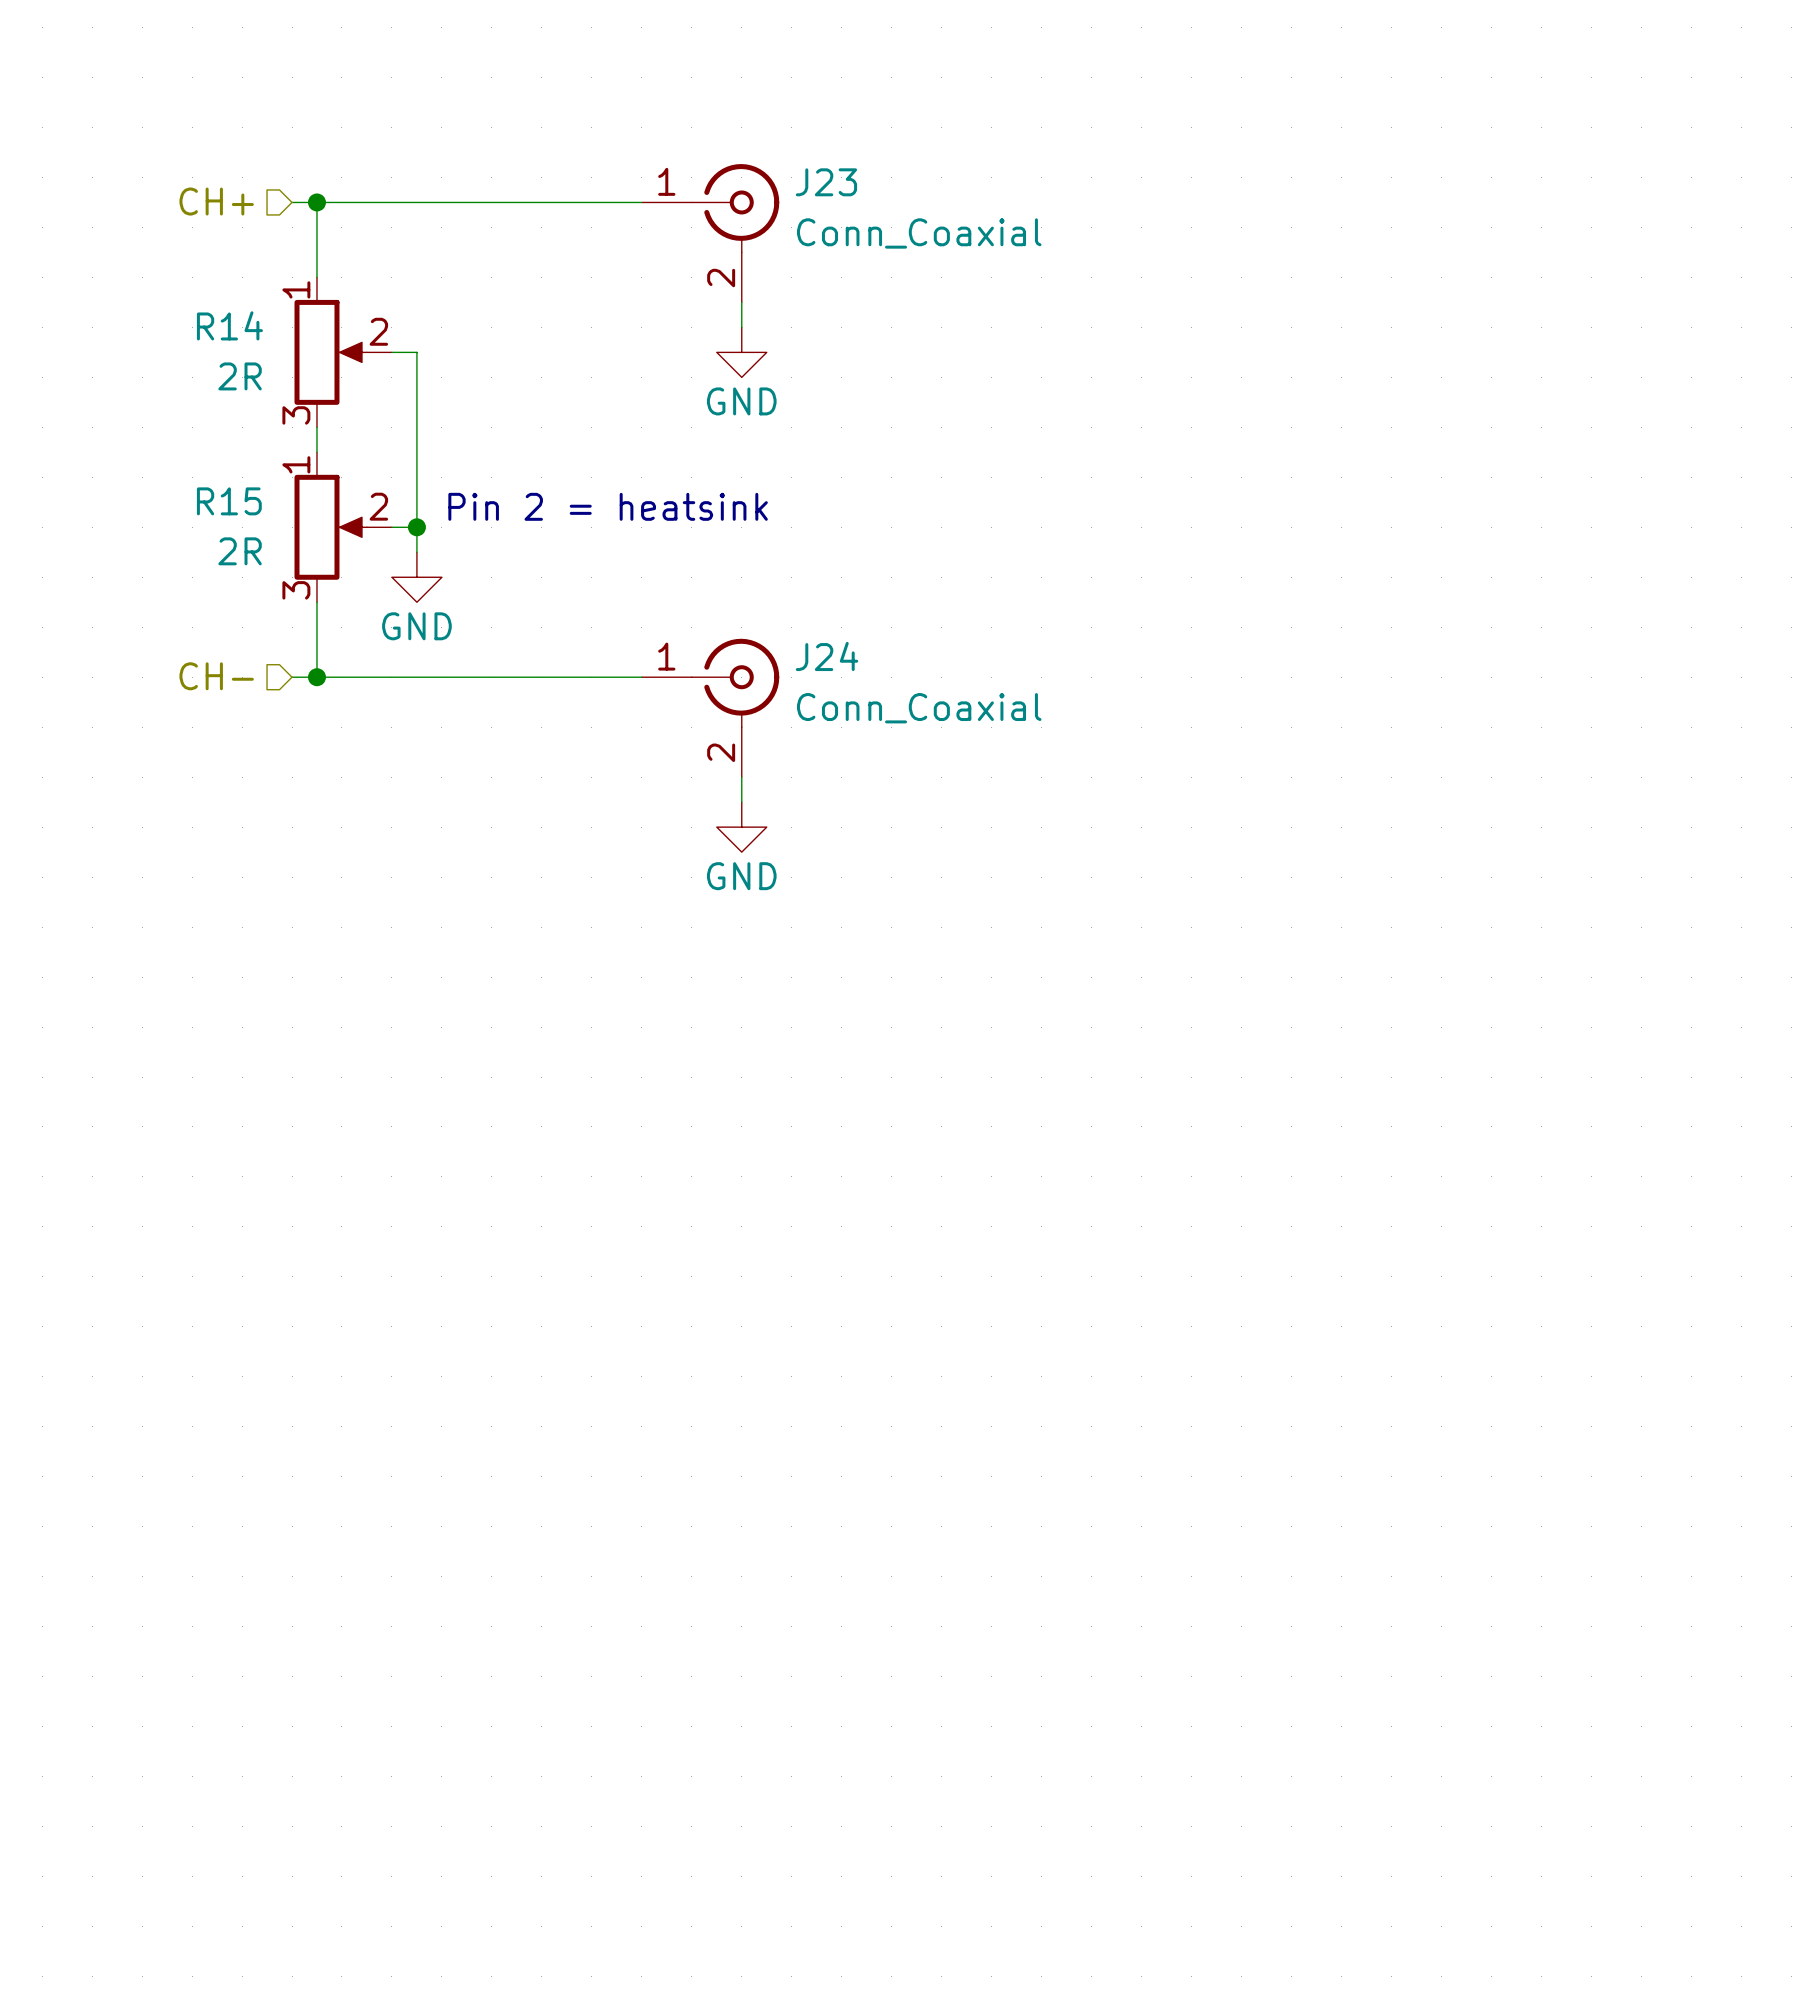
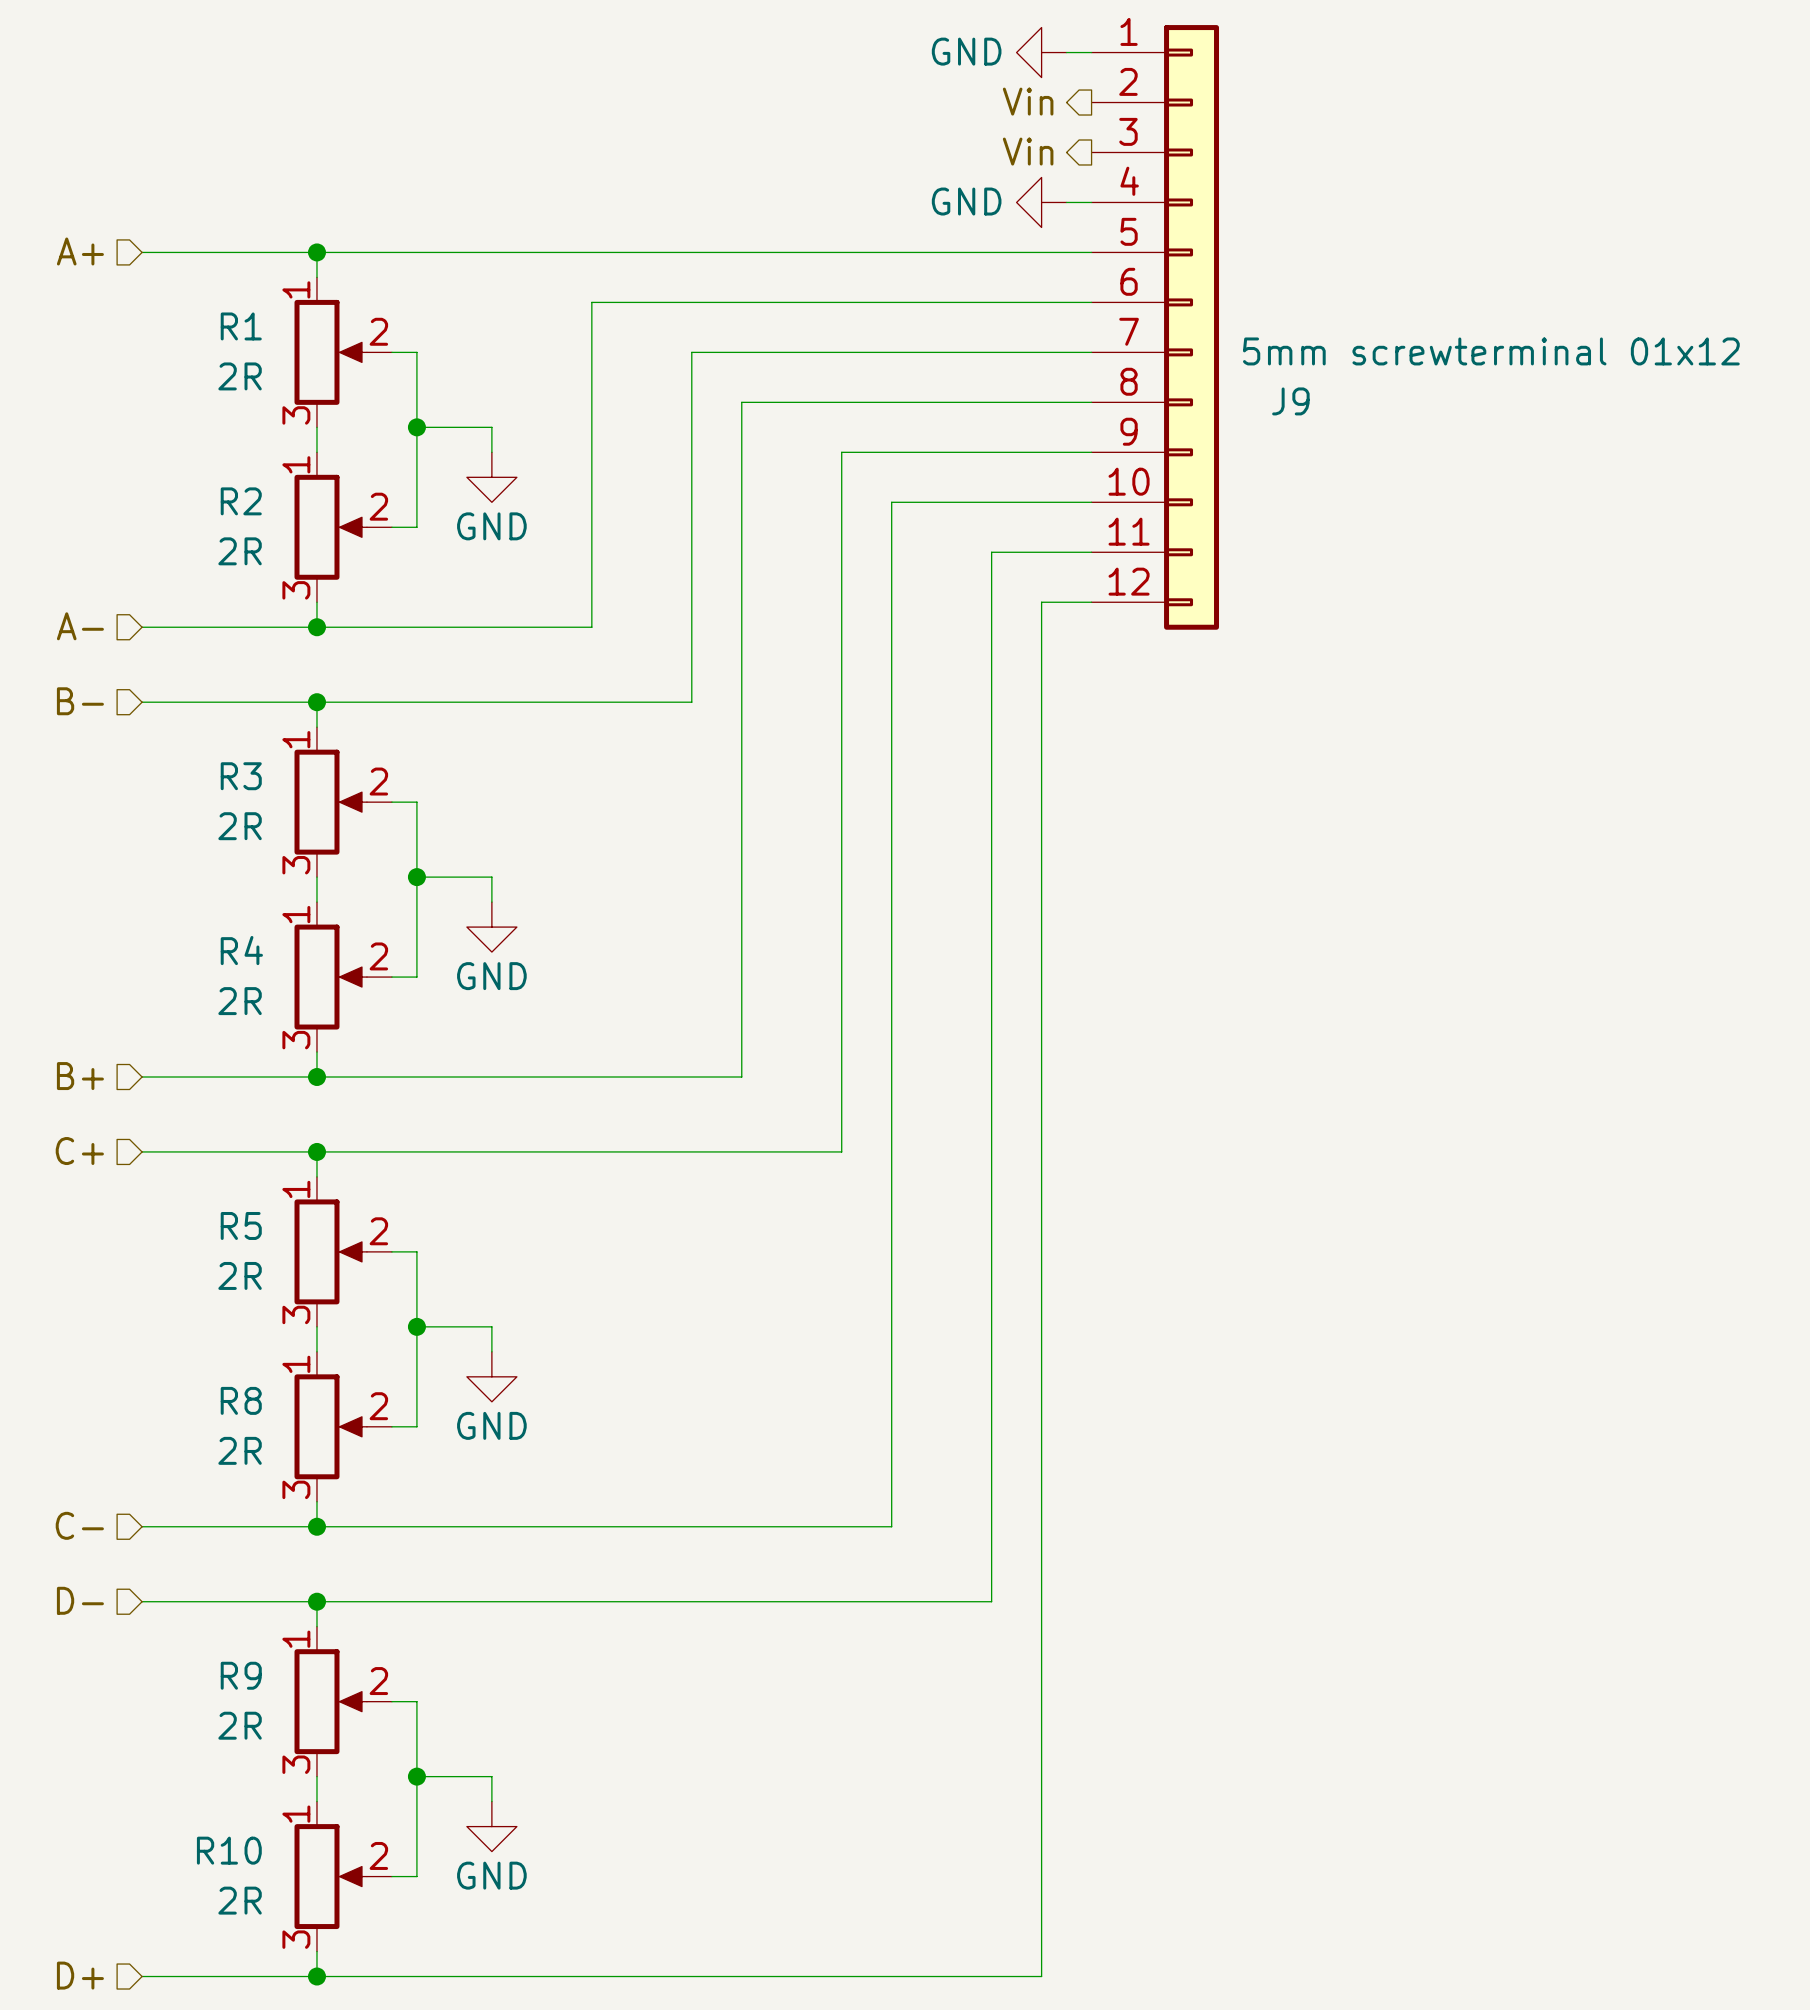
power symbol: none -> GND (1041, 52)
wire: none -> (1066, 52) (1091, 52)
hierarchical label: none -> Vin (1028, 101)
hierarchical label: none -> Vin (1028, 151)
hierarchical label: CH+ (216, 201) -> none
wire: (292, 202) (641, 202) -> none
wire: (316, 202) (316, 252) -> none
junction position: (316, 202) -> (316, 252)
power symbol: none -> GND (1041, 202)
wire: none -> (1066, 202) (1091, 202)
J23: Conn_Coaxial (710, 233) -> none
hierarchical label: none -> A+ (80, 251)
wire: none -> (142, 252) (1091, 252)
wire: (741, 302) (741, 327) -> none
wire: none -> (1091, 302) (591, 302) (591, 627) (142, 627)
R14 name: R14 (229, 325) -> R1 (241, 326)
J9: none -> 5mm screwterminal 01x12 (1155, 327)
power symbol: GND (741, 352) -> none
wire: none -> (1091, 352) (691, 352) (691, 702) (142, 702)
wire: none -> (1091, 402) (741, 402) (741, 777)
wire: none -> (416, 427) (491, 427) (491, 452)
junction: none -> (416, 427)
wire: none -> (1091, 452) (841, 452) (841, 1151) (142, 1151)
R15 name: R15 (229, 501) -> R2 (241, 501)
wire: none -> (1091, 502) (891, 502) (891, 1526) (142, 1526)
text: Pin 2 = heatsink (608, 506) -> none
wire: (416, 527) (416, 552) -> (316, 702) (316, 727)
junction: (416, 527) -> none
wire: none -> (1091, 552) (991, 552) (991, 1601) (142, 1601)
power symbol position: GND (416, 577) -> GND (491, 477)
wire: none -> (1091, 602) (1041, 602) (1041, 1976) (142, 1976)
hierarchical label: none -> A- (80, 626)
wire: (316, 627) (316, 677) -> none
junction: none -> (316, 627)
hierarchical label: CH- (216, 676) -> none
wire: (292, 677) (641, 677) -> none
junction: (316, 677) -> none
hierarchical label: none -> B- (80, 701)
junction: none -> (316, 702)
J24: Conn_Coaxial (710, 707) -> none
R3: none -> 2R (343, 802)
wire: none -> (391, 802) (416, 802) (416, 977) (391, 977)
wire: none -> (741, 802) (741, 1077) (142, 1077)
power symbol: GND (741, 827) -> none
wire: none -> (316, 877) (316, 902)
wire: none -> (416, 877) (491, 877) (491, 902)
junction: none -> (416, 877)
power symbol: none -> GND (491, 927)
R4: none -> 2R (343, 977)
wire: none -> (316, 1052) (316, 1077)
hierarchical label: none -> B+ (80, 1076)
junction: none -> (316, 1077)
hierarchical label: none -> C+ (79, 1151)
wire: none -> (316, 1151) (316, 1176)
junction: none -> (316, 1151)
R5: none -> 2R (343, 1251)
wire: none -> (391, 1251) (416, 1251) (416, 1426) (391, 1426)
wire: none -> (316, 1326) (316, 1351)
wire: none -> (416, 1326) (491, 1326) (491, 1351)
junction: none -> (416, 1326)
power symbol: none -> GND (491, 1376)
R8: none -> 2R (343, 1426)
wire: none -> (316, 1501) (316, 1526)
hierarchical label: none -> C- (79, 1525)
junction: none -> (316, 1526)
hierarchical label: none -> D- (80, 1600)
wire: none -> (316, 1601) (316, 1626)
junction: none -> (316, 1601)
R9: none -> 2R (343, 1701)
wire: none -> (391, 1701) (416, 1701) (416, 1876) (391, 1876)
wire: none -> (316, 1776) (316, 1801)
wire: none -> (416, 1776) (491, 1776) (491, 1801)
junction: none -> (416, 1776)
power symbol: none -> GND (491, 1826)
R10: none -> 2R (343, 1876)
wire: none -> (316, 1951) (316, 1976)
hierarchical label: none -> D+ (80, 1975)
junction: none -> (316, 1976)

